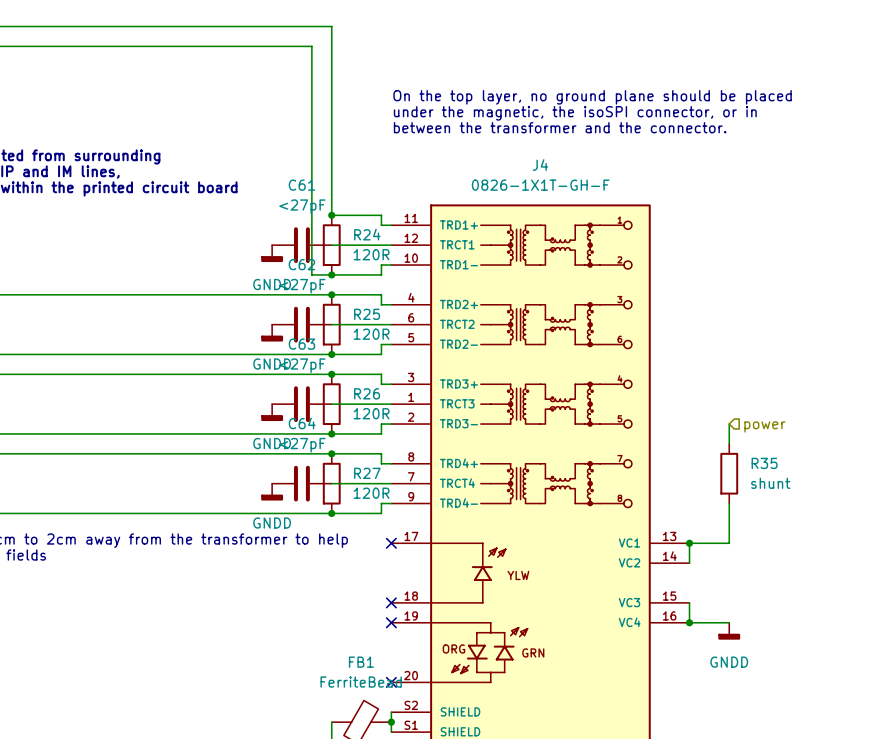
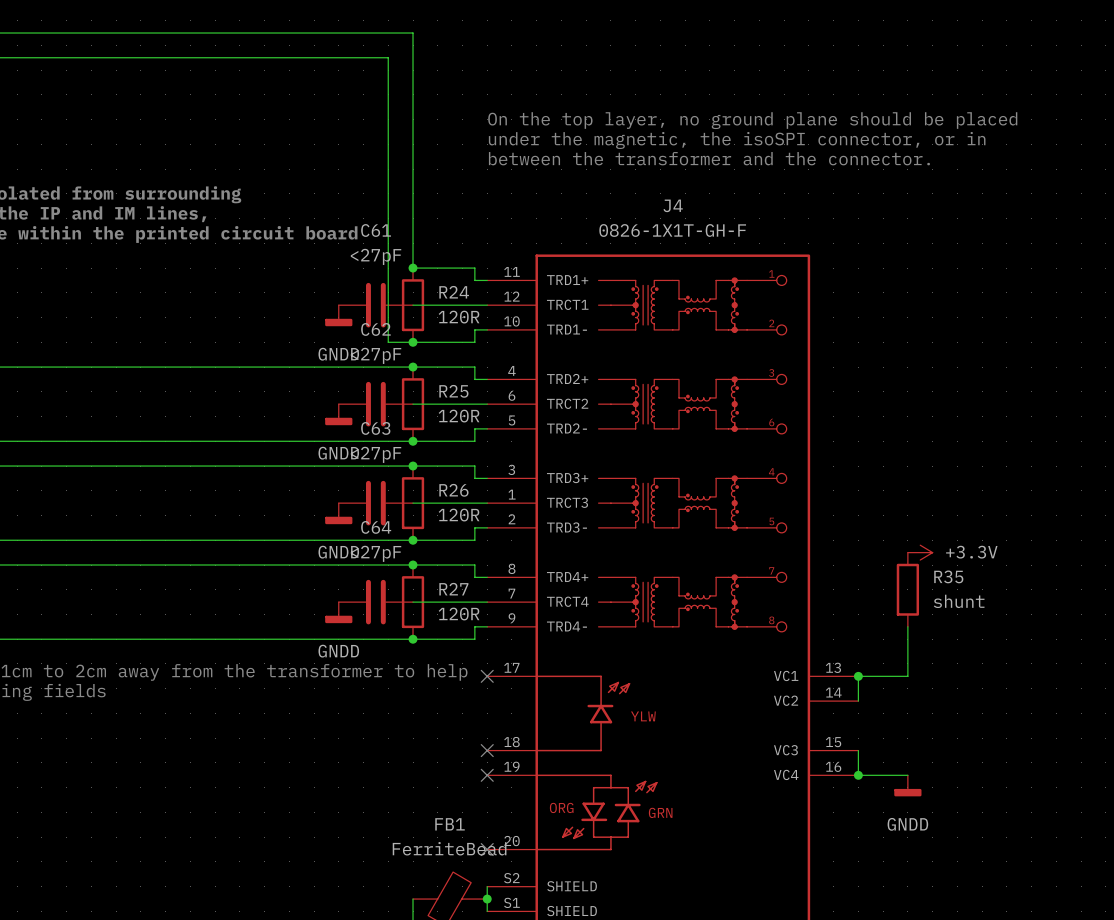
wire: (729, 424) (729, 443) -> none
hierarchical label: power (764, 426) -> none
power symbol: none -> +3.3V (920, 552)

